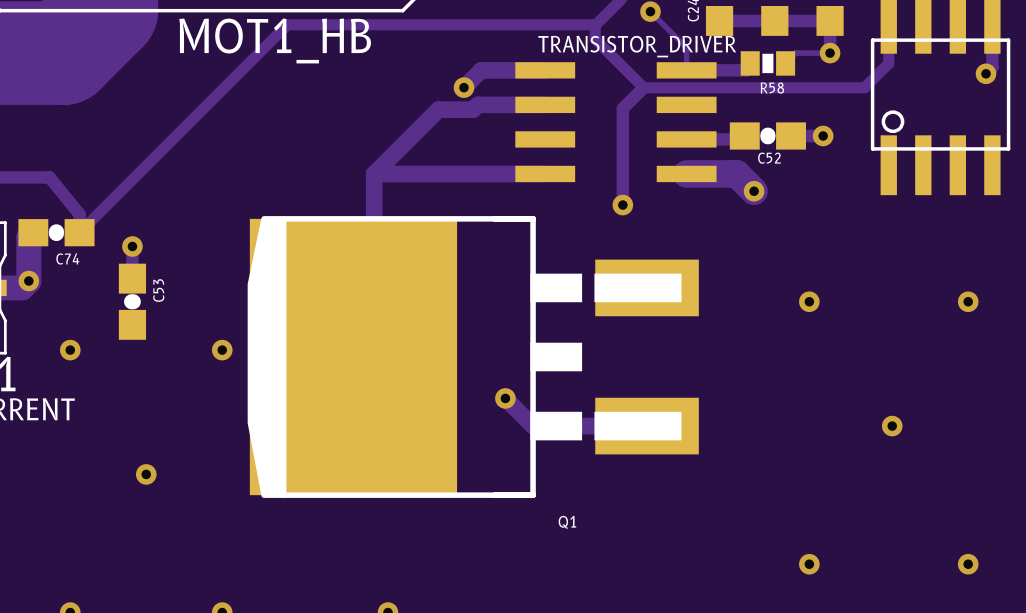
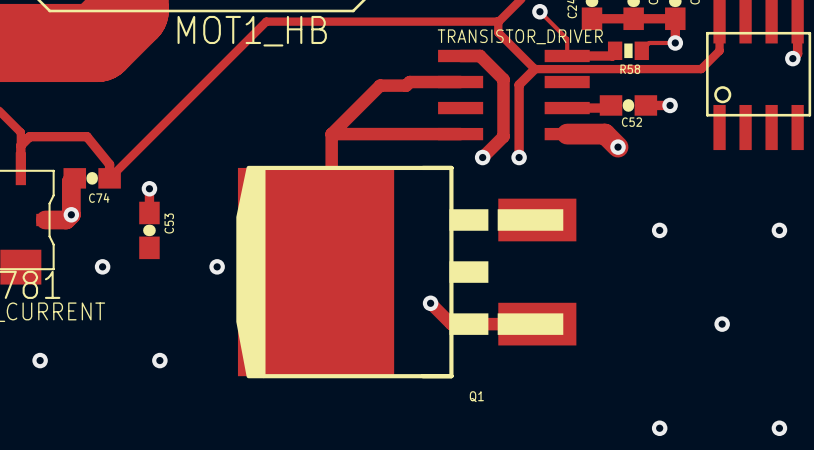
track: (545, 70) (481, 70) (463, 87) -> (460, 55) (480, 55) (503, 79) (503, 136) (482, 157)
via position: (463, 87) -> (482, 157)

